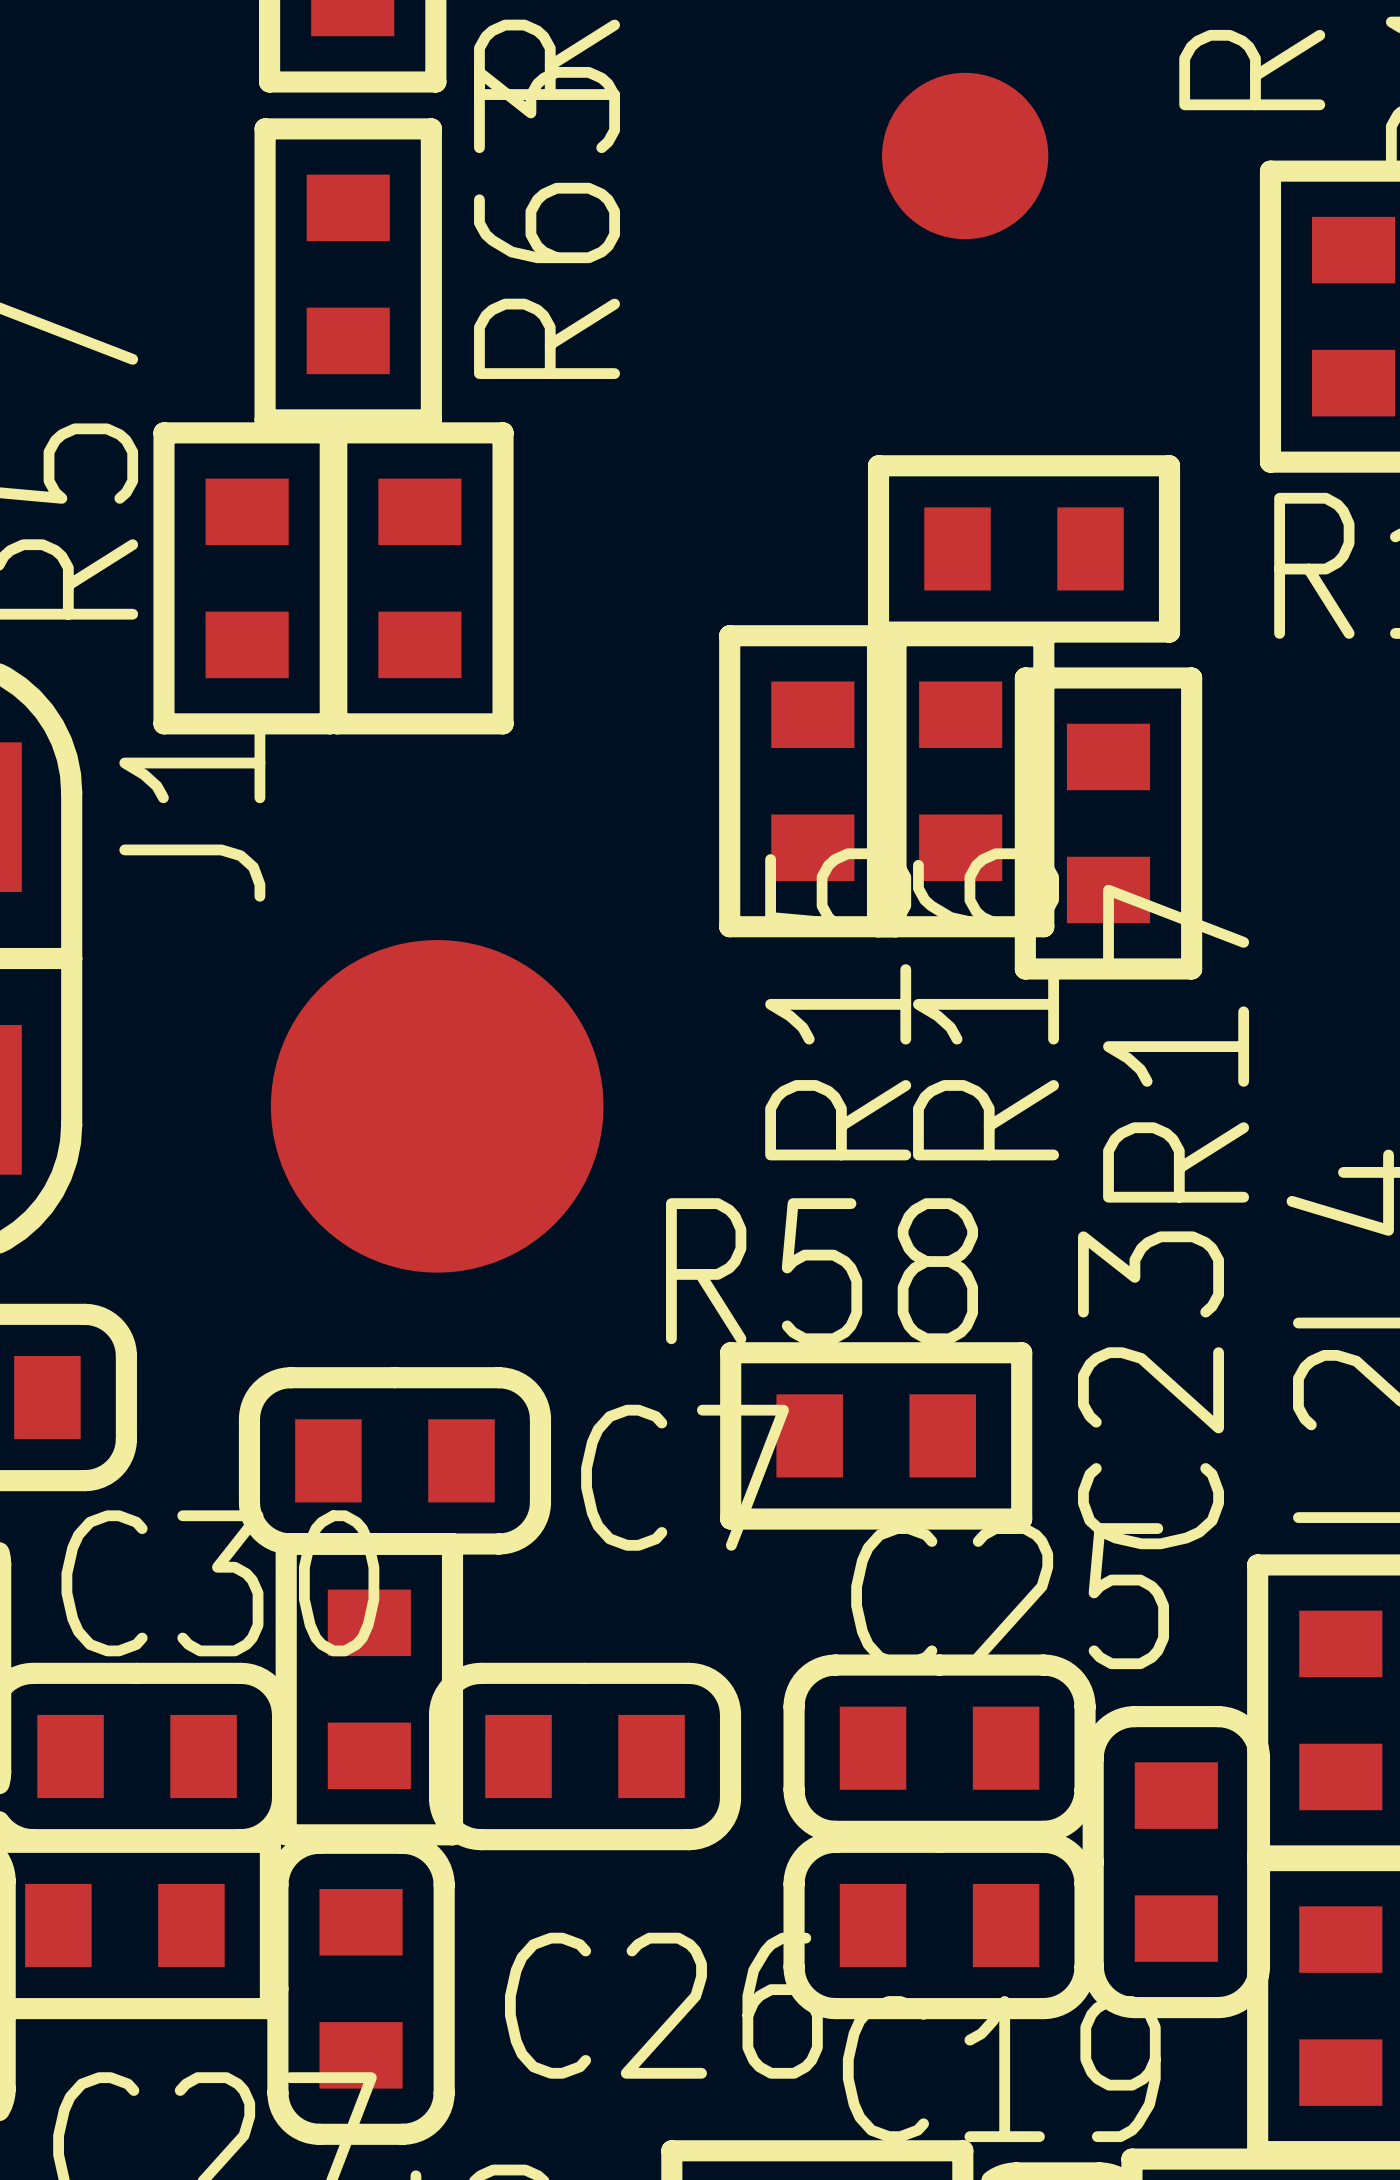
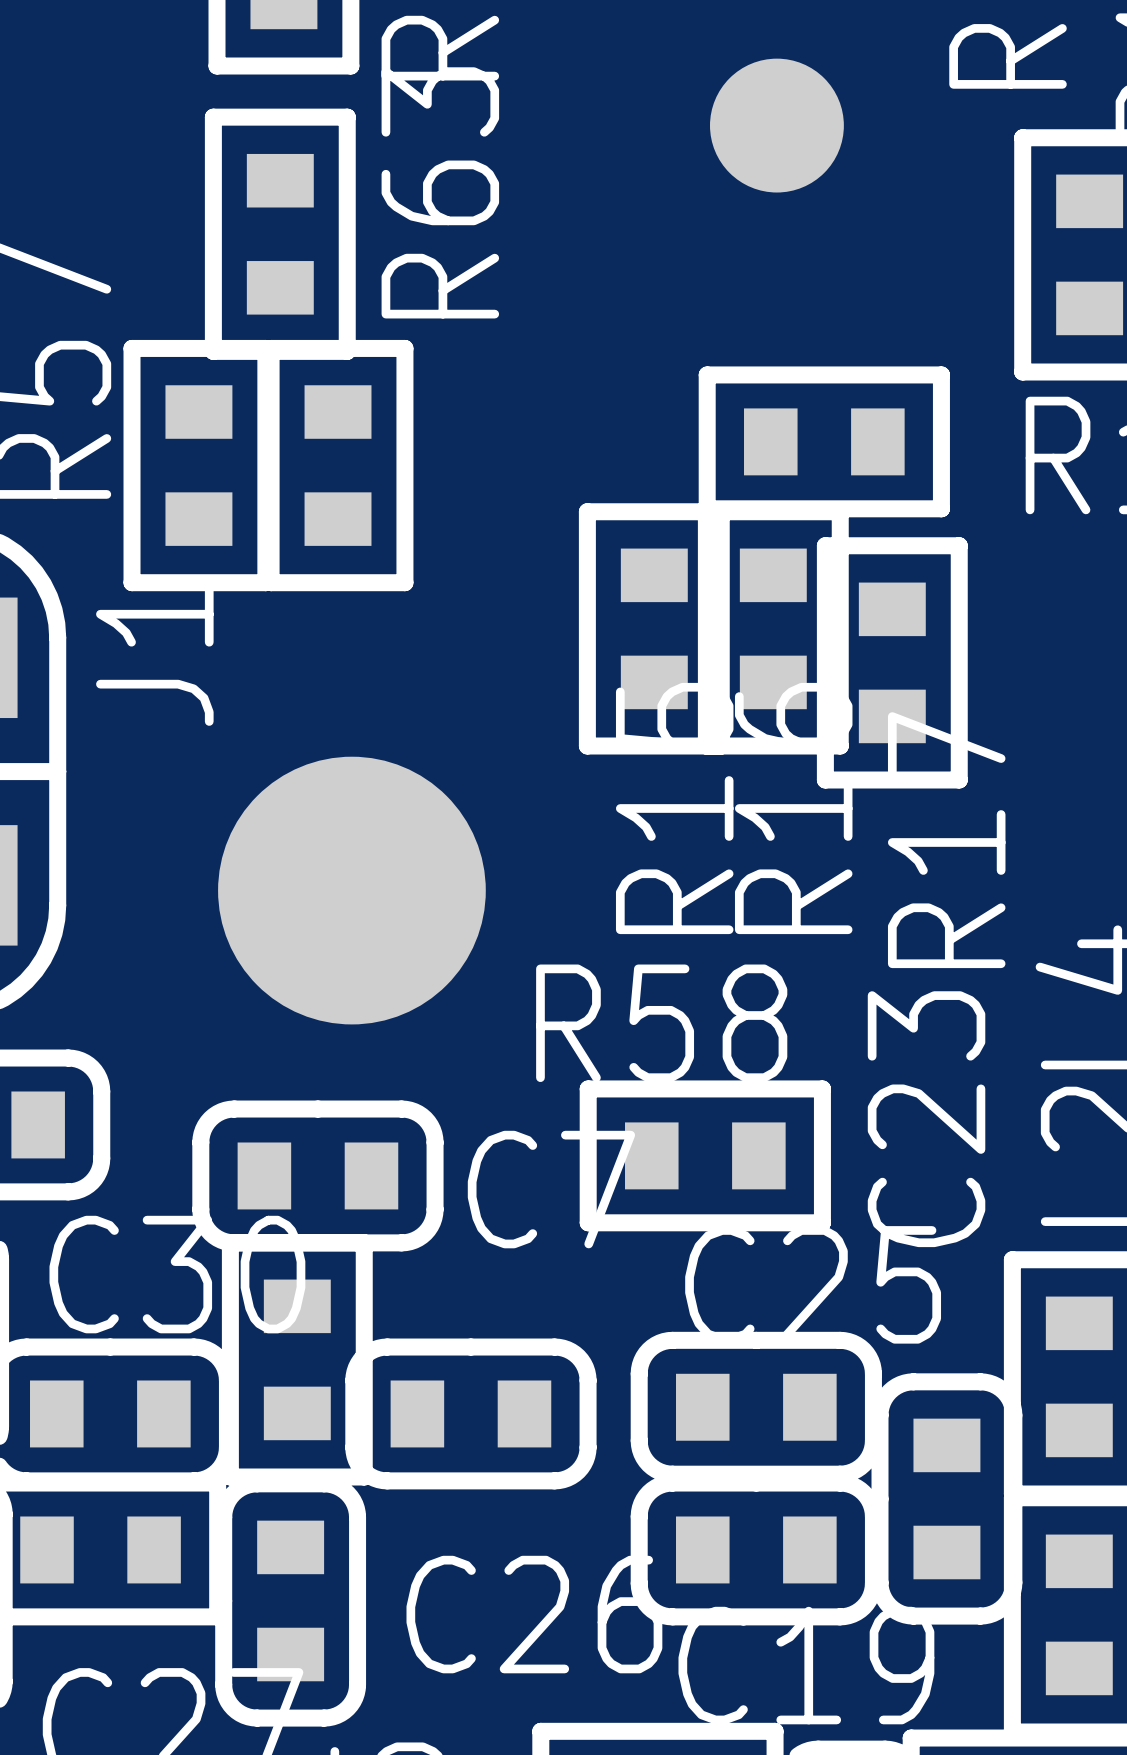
R63 position: (348, 274) -> (280, 234)

